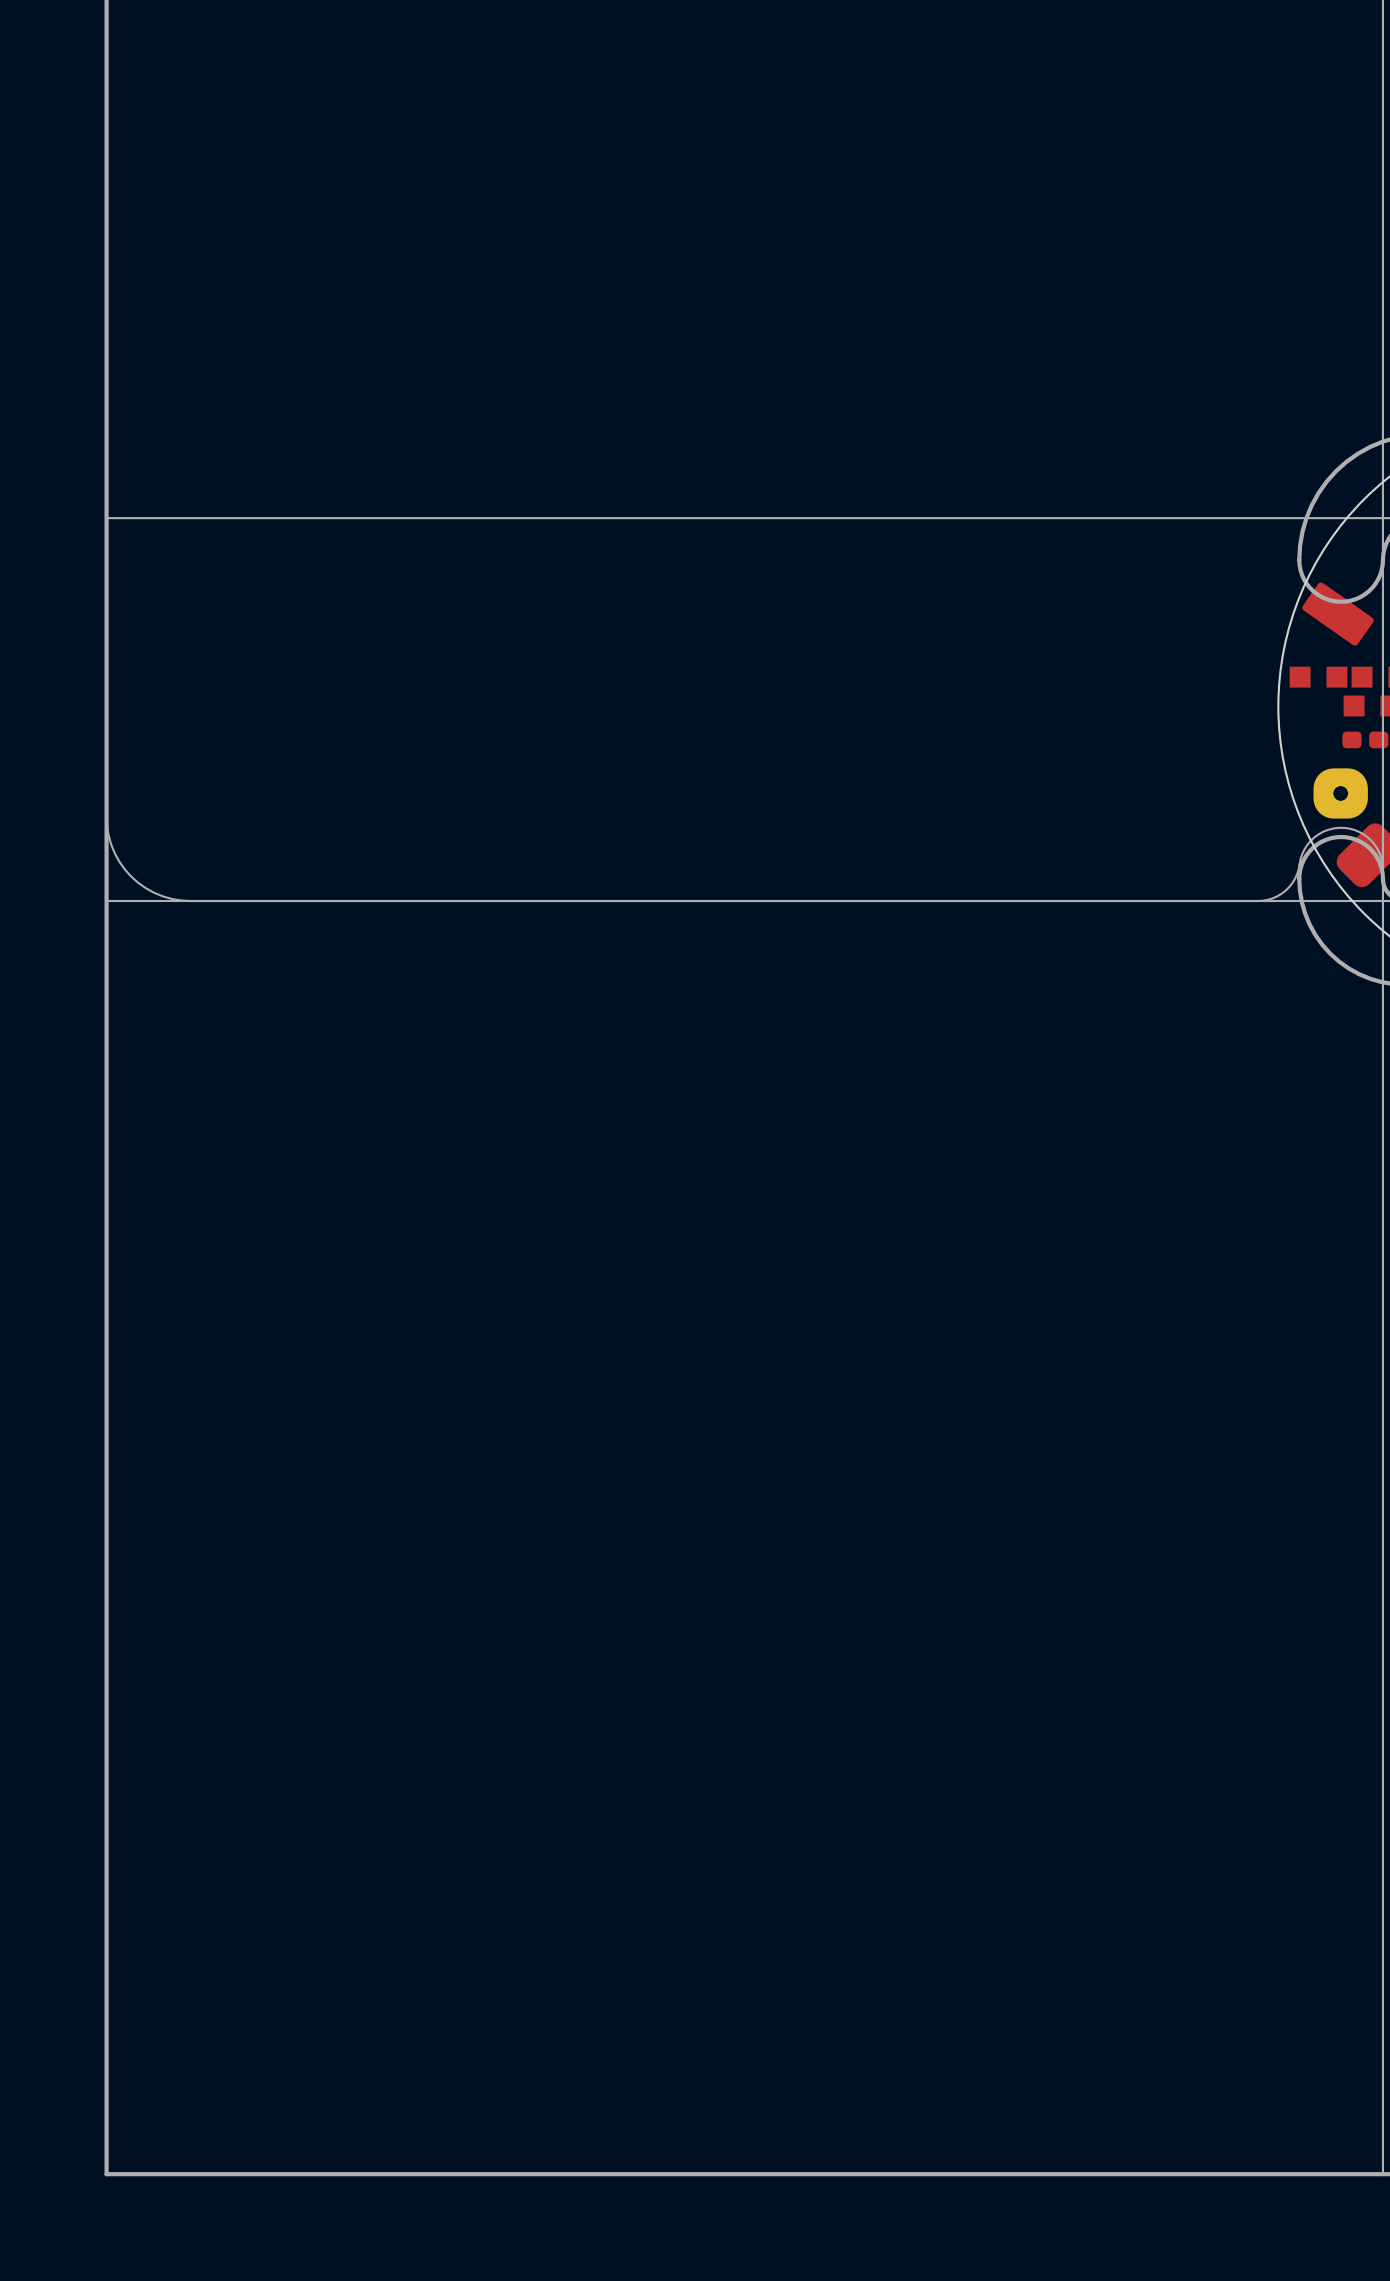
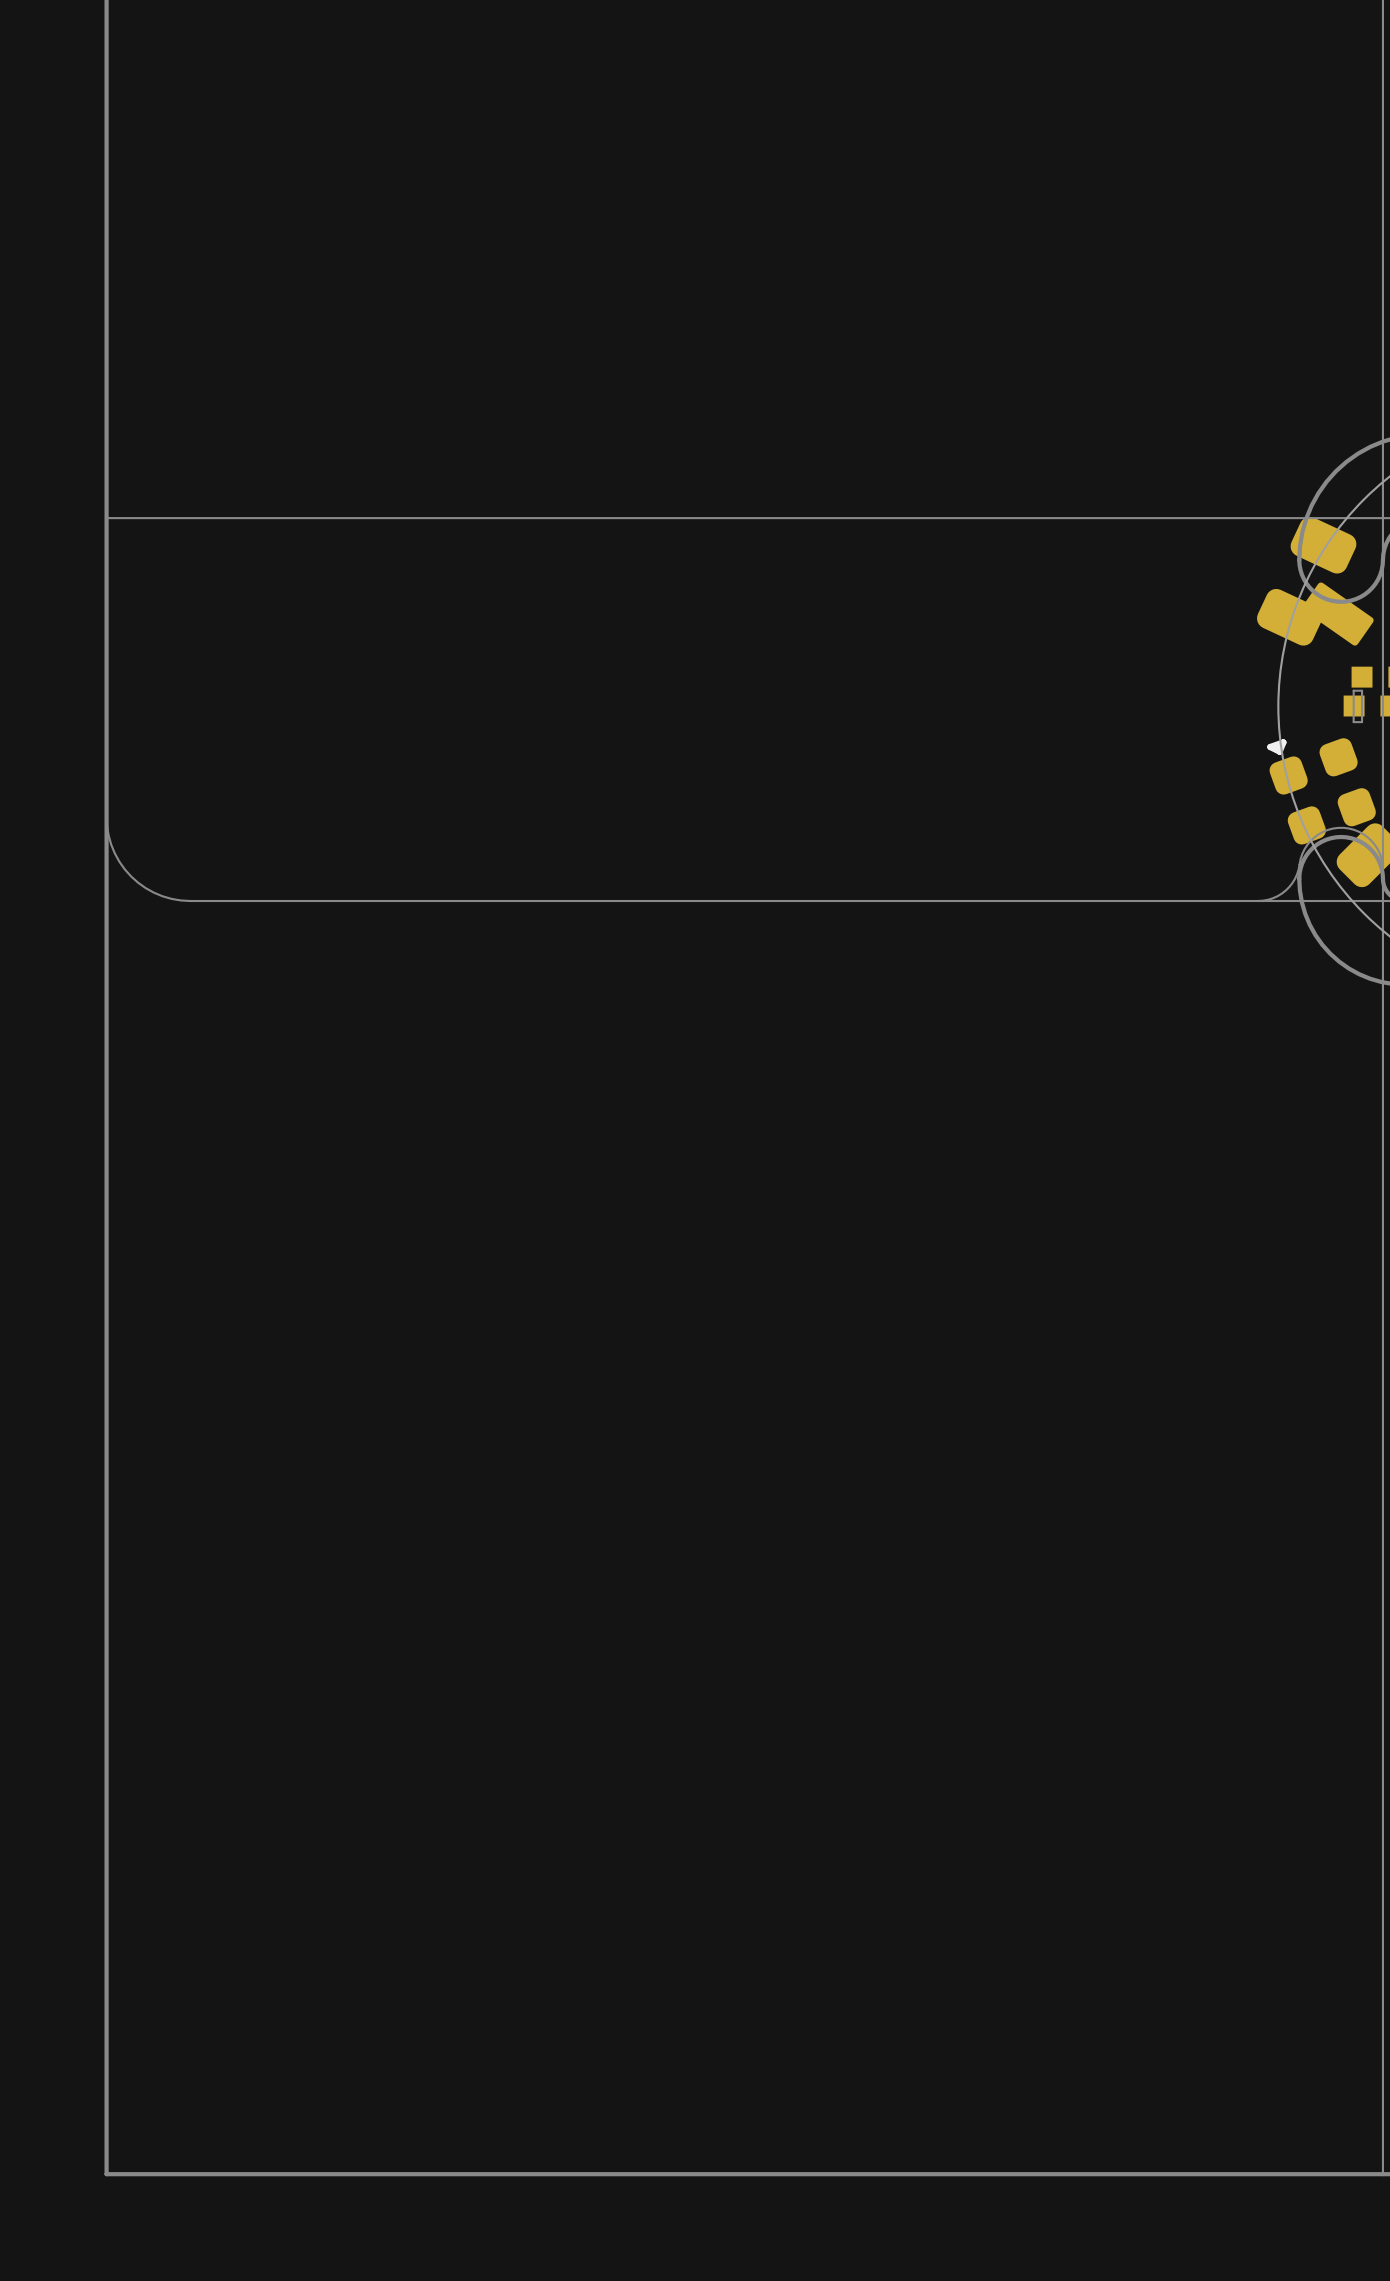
part: none -> (1306, 581)
part: (1318, 677) -> none
line: none -> (1353, 690) (1362, 690) (1362, 722) (1353, 722) (1353, 690)
part: (1365, 739) -> none
line: none -> (1283, 742) (1279, 751) (1270, 747) (1283, 742)
part footprint: [1313, 768, 1368, 819] -> [1269, 738, 1376, 845]
line: (106, 901) (190, 901) -> none

